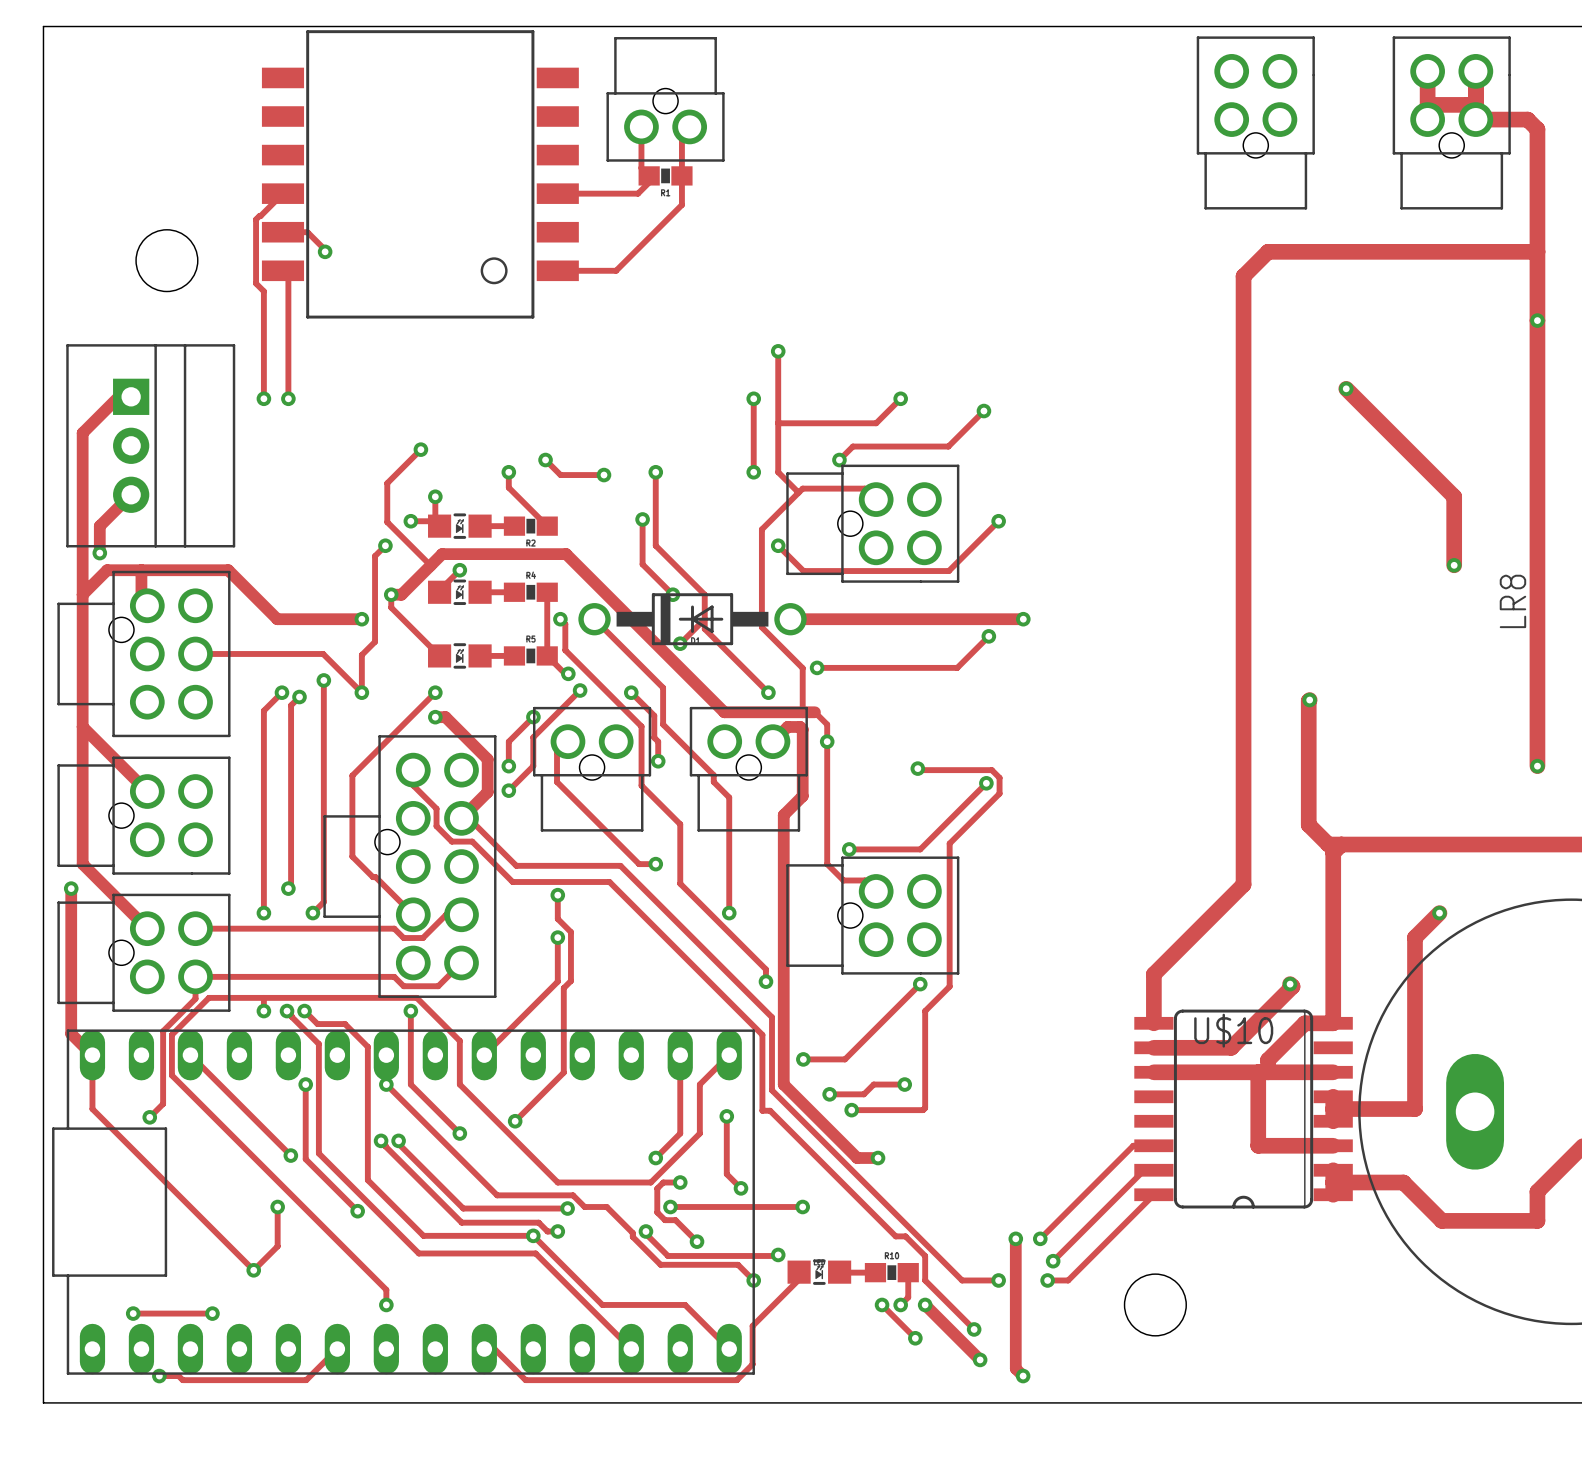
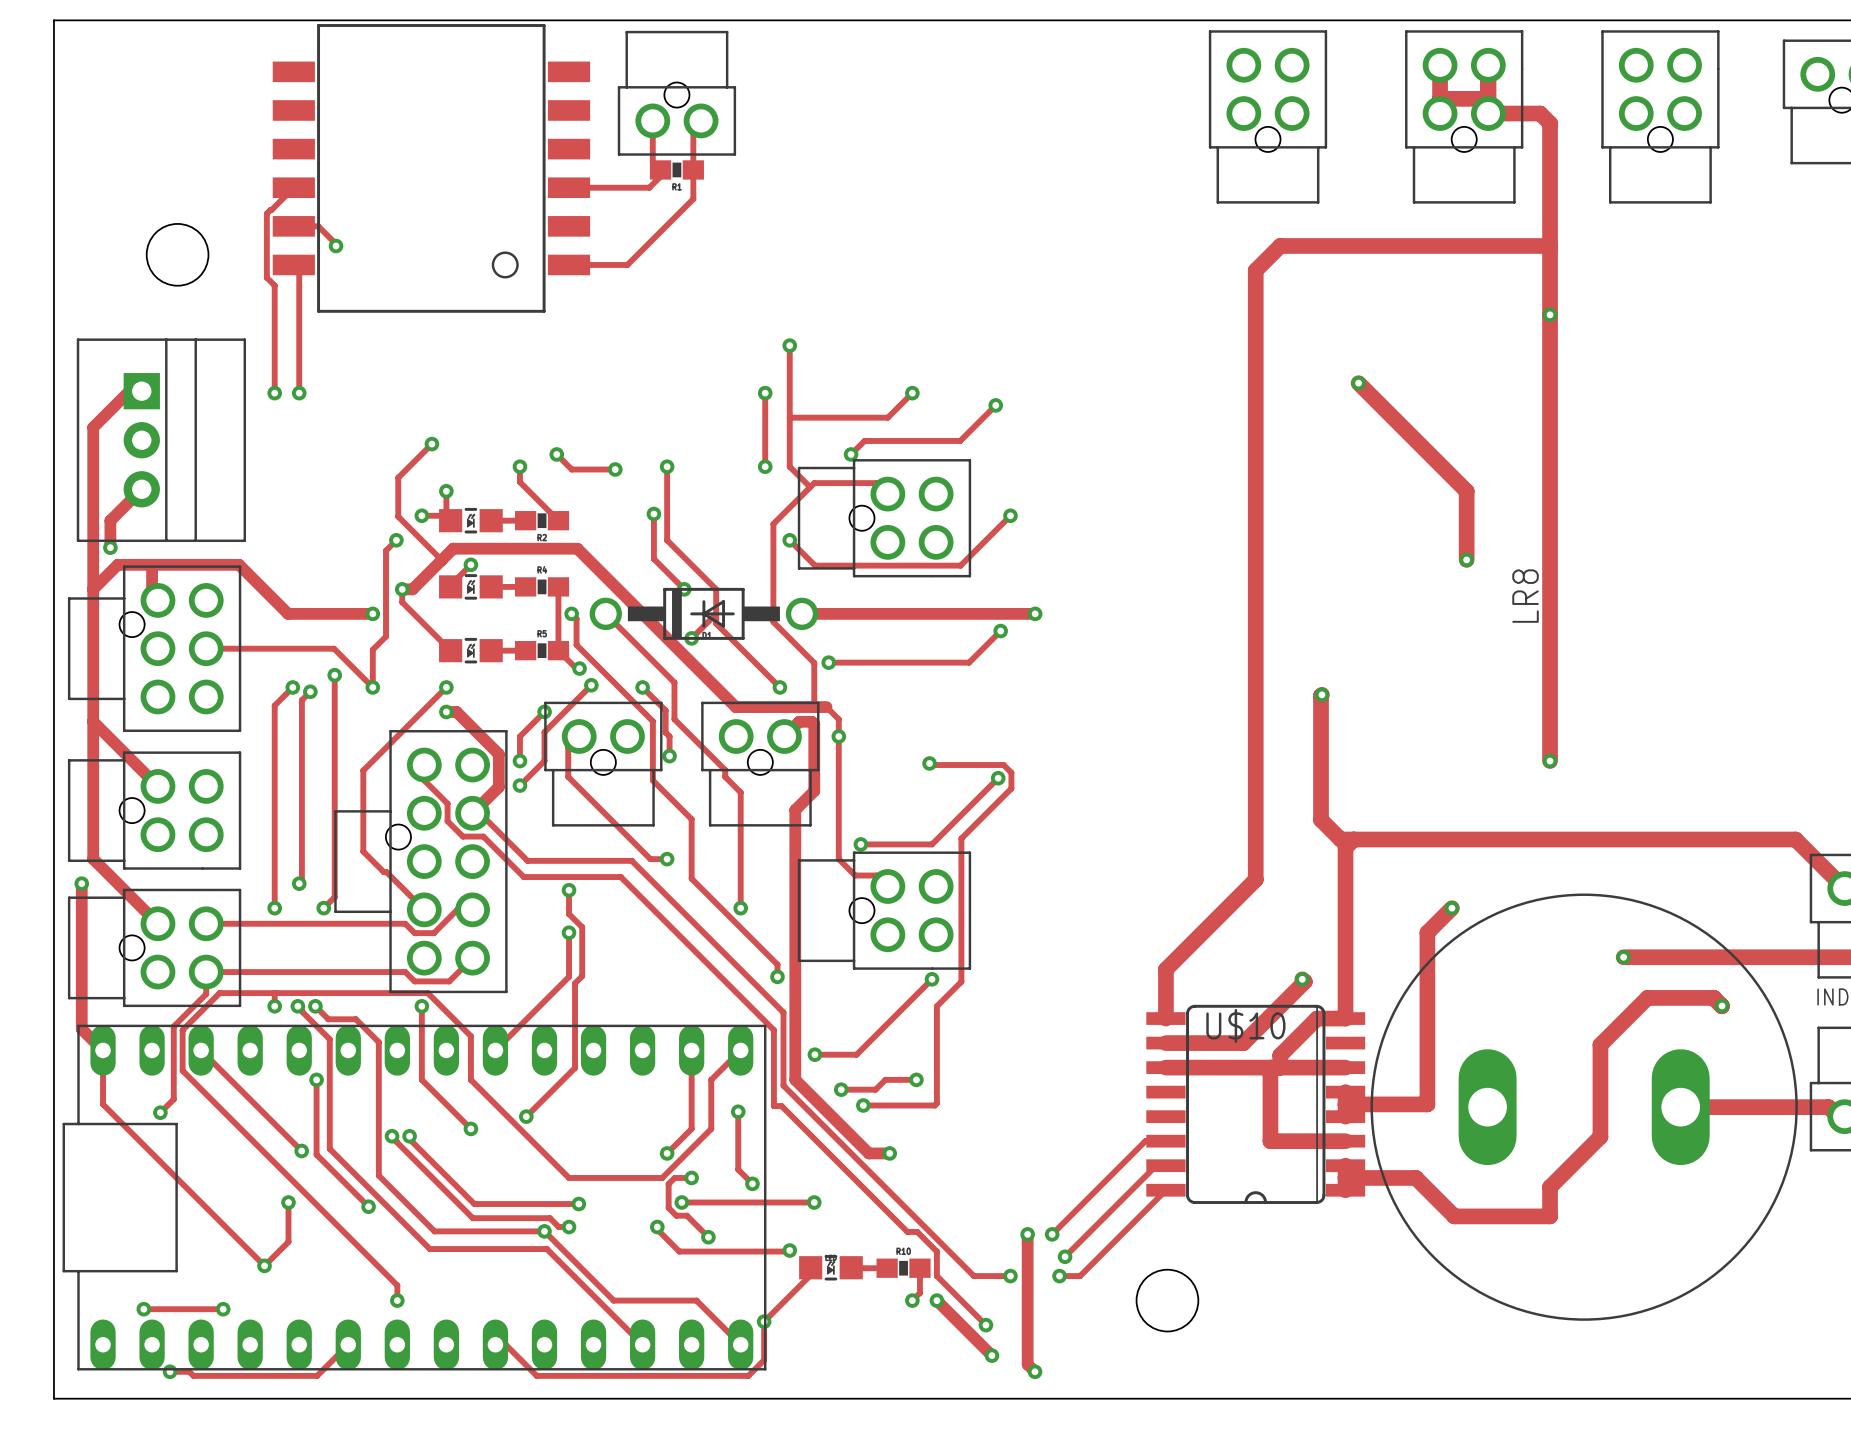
track: (386, 1084) (497, 1195) (573, 1195) (584, 1207) (606, 1207) (660, 1264) (738, 1264) (753, 1280) -> none
via: (386, 1084) -> none
via position: (753, 1280) -> (764, 1321)
track: (882, 1304) (915, 1338) -> none
via: (882, 1304) -> none
via: (915, 1338) -> none

